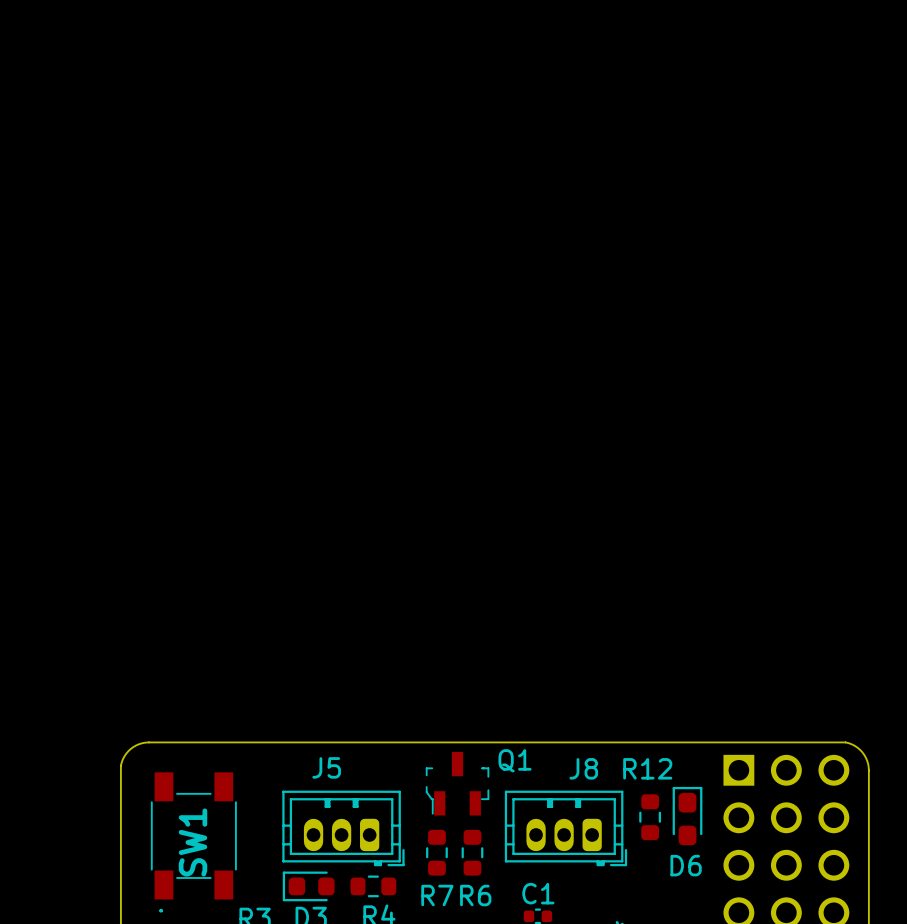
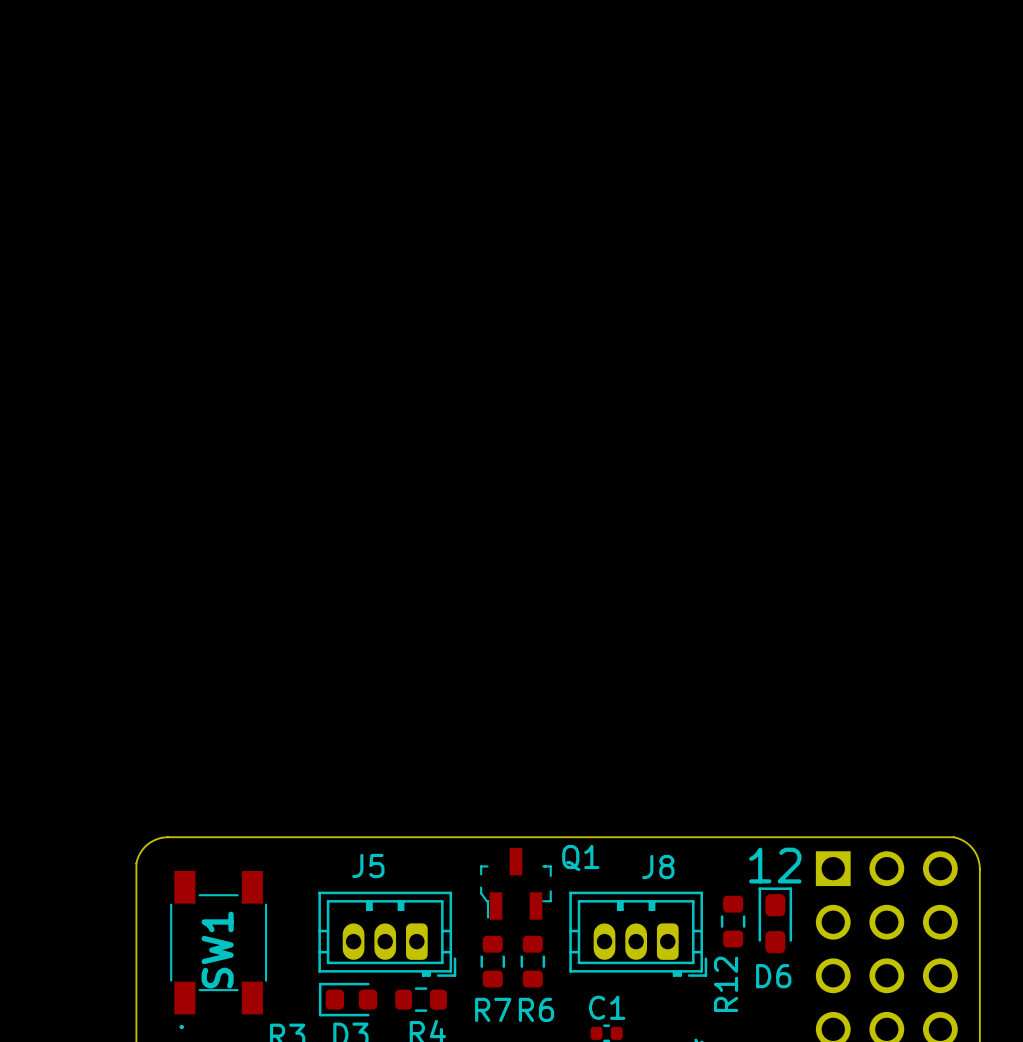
text: none -> 12 (775, 865)
R12 name rotation: 0° (647, 768) -> 90° counterclockwise (726, 984)
R12 name position: R12 (647, 768) -> R12 (726, 984)

